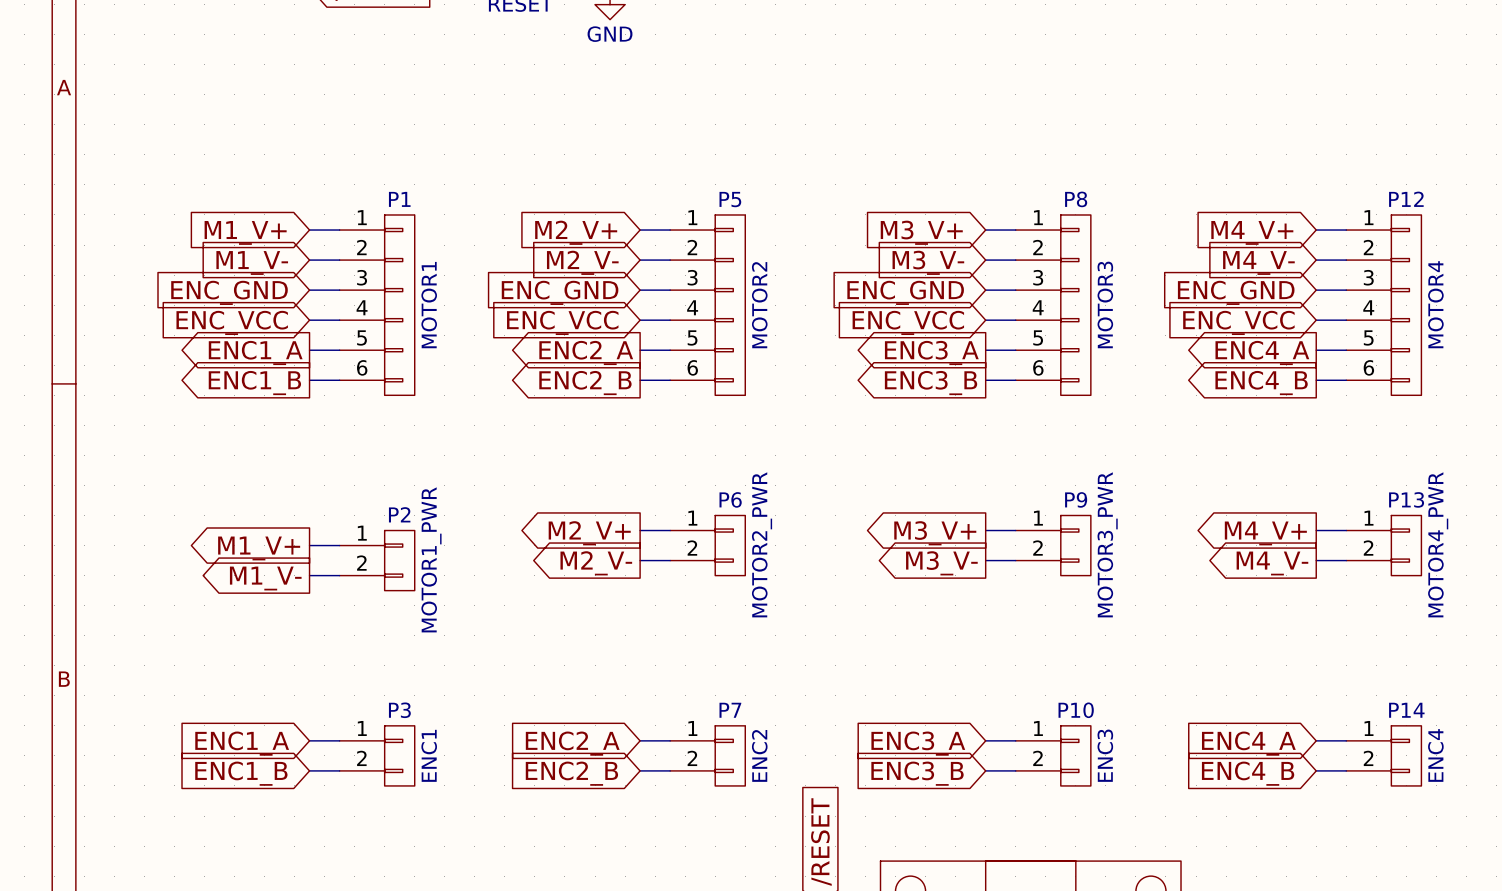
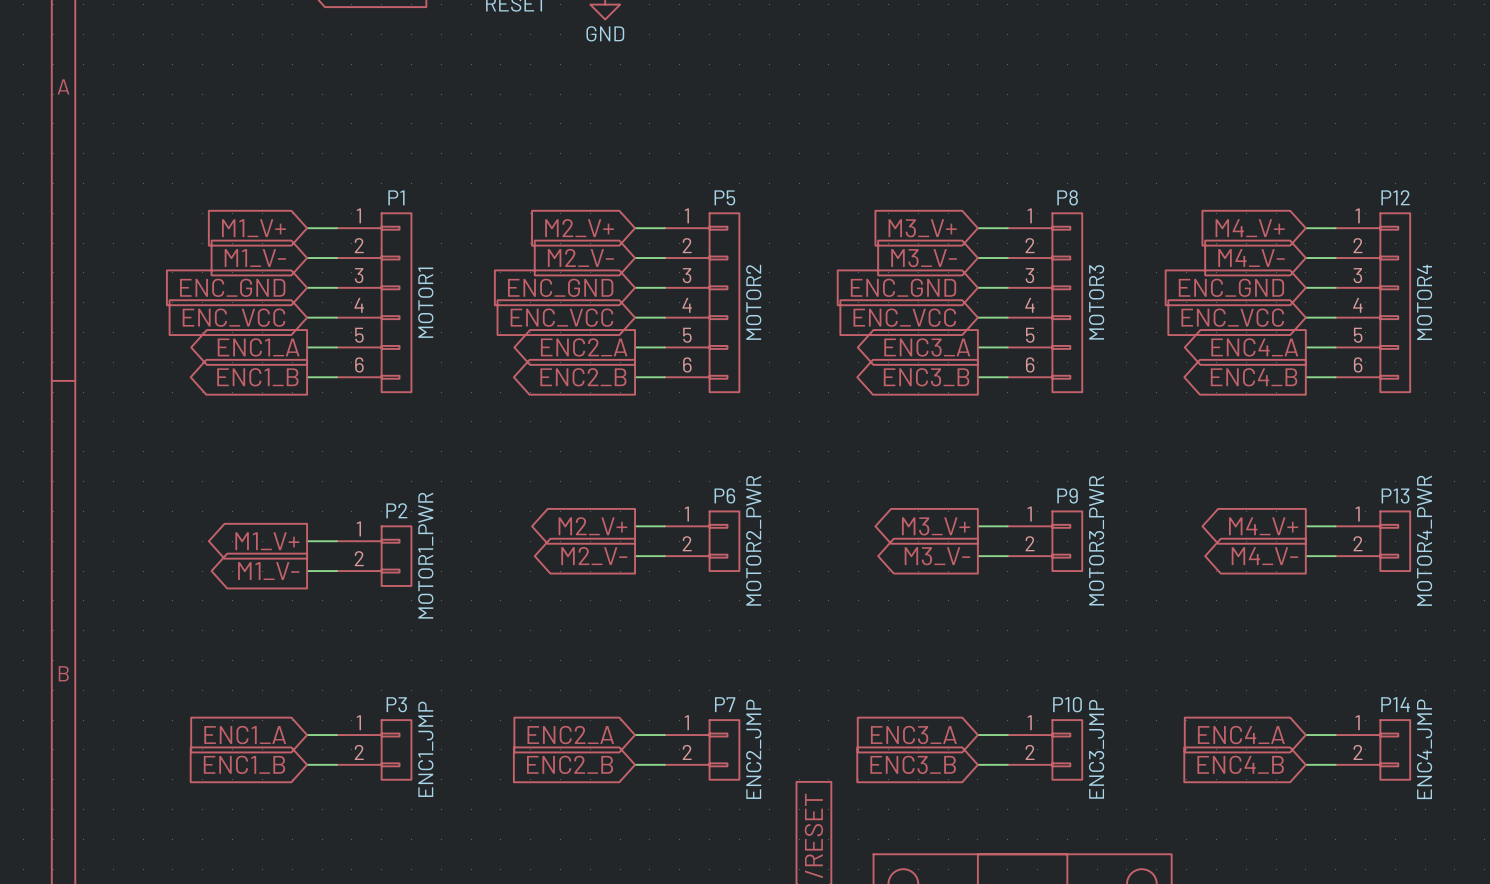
P3 value: ENC1 (429, 755) -> ENC1_JMP (425, 749)
P7 value: ENC2 (759, 755) -> ENC2_JMP (753, 749)
P10 value: ENC3 (1105, 755) -> ENC3_JMP (1096, 749)
P14 value: ENC4 (1435, 755) -> ENC4_JMP (1424, 749)

